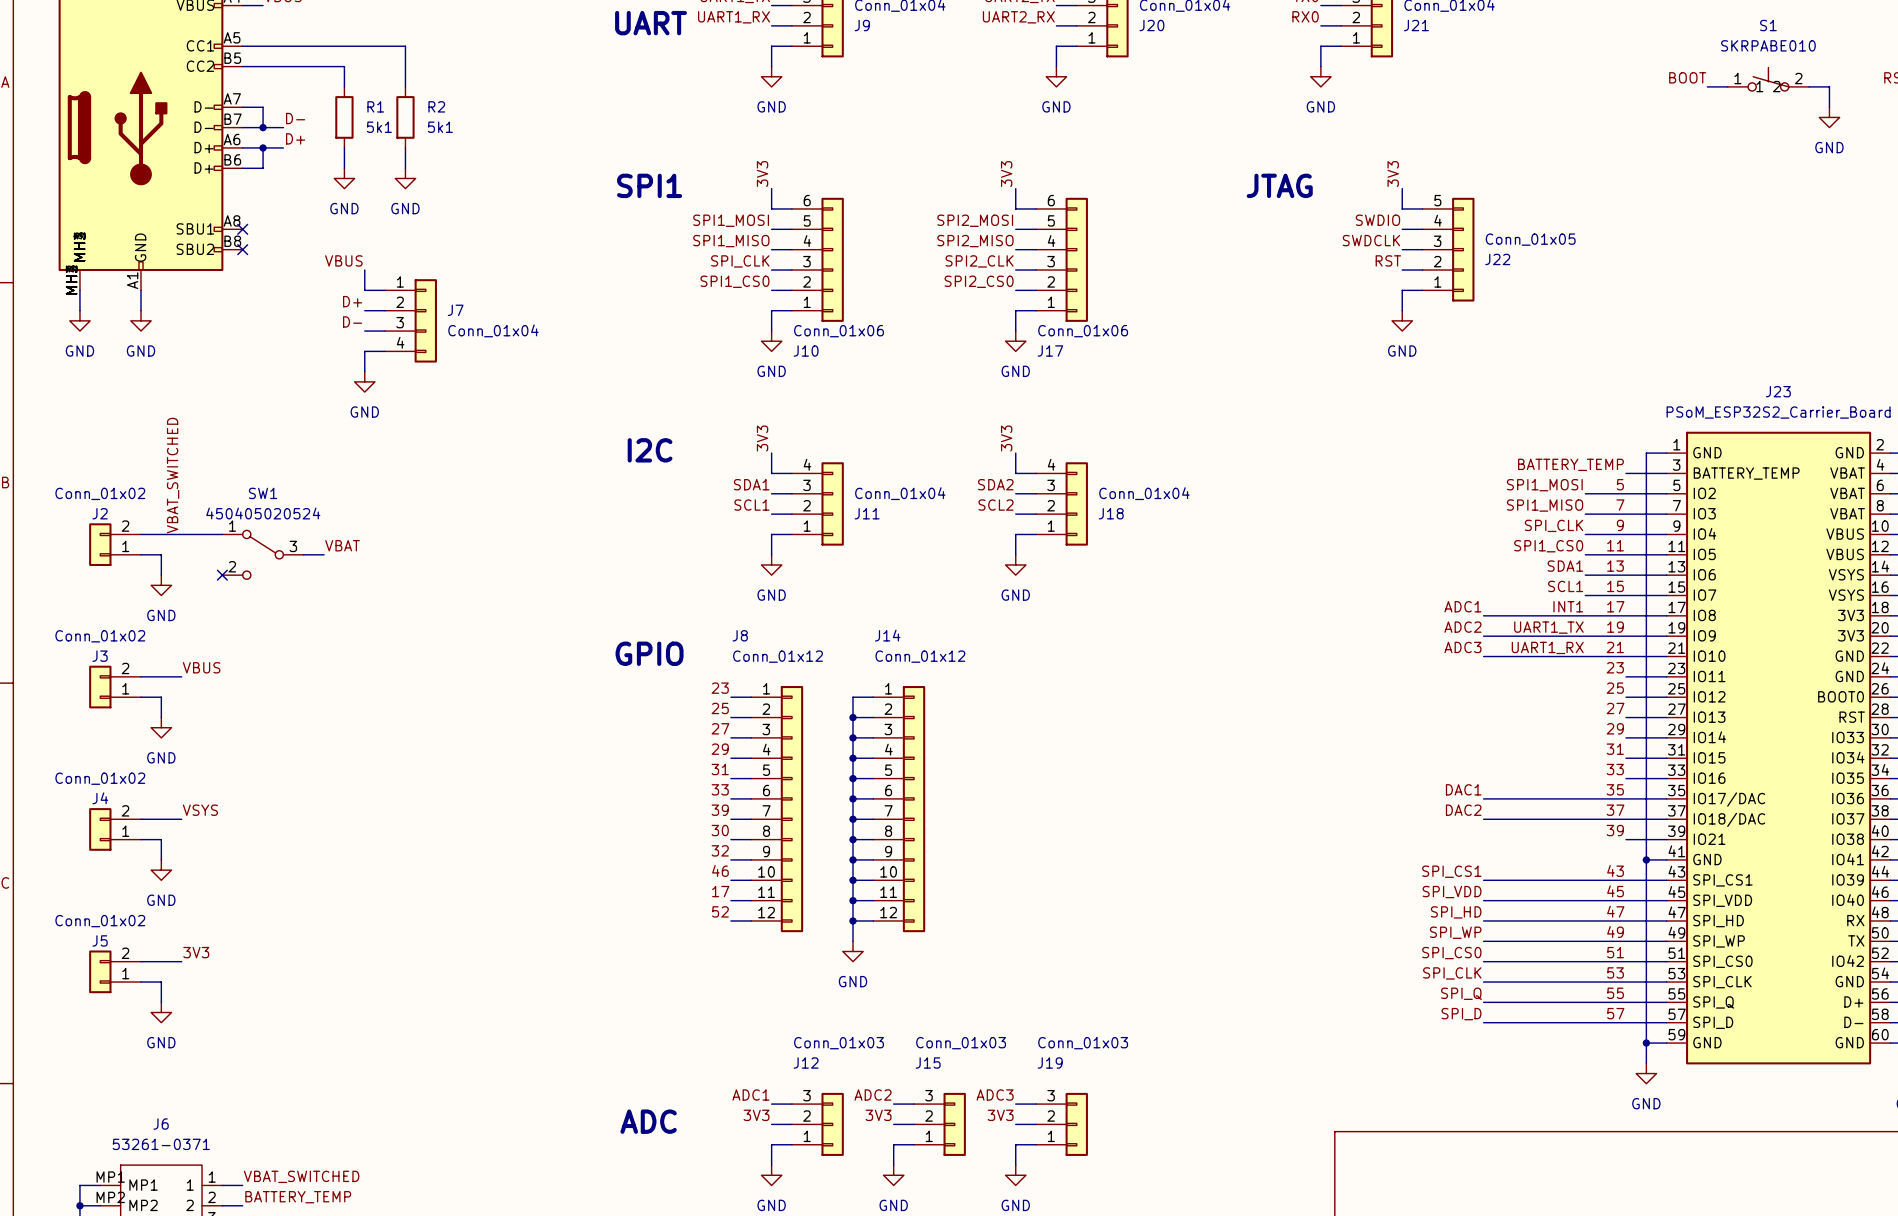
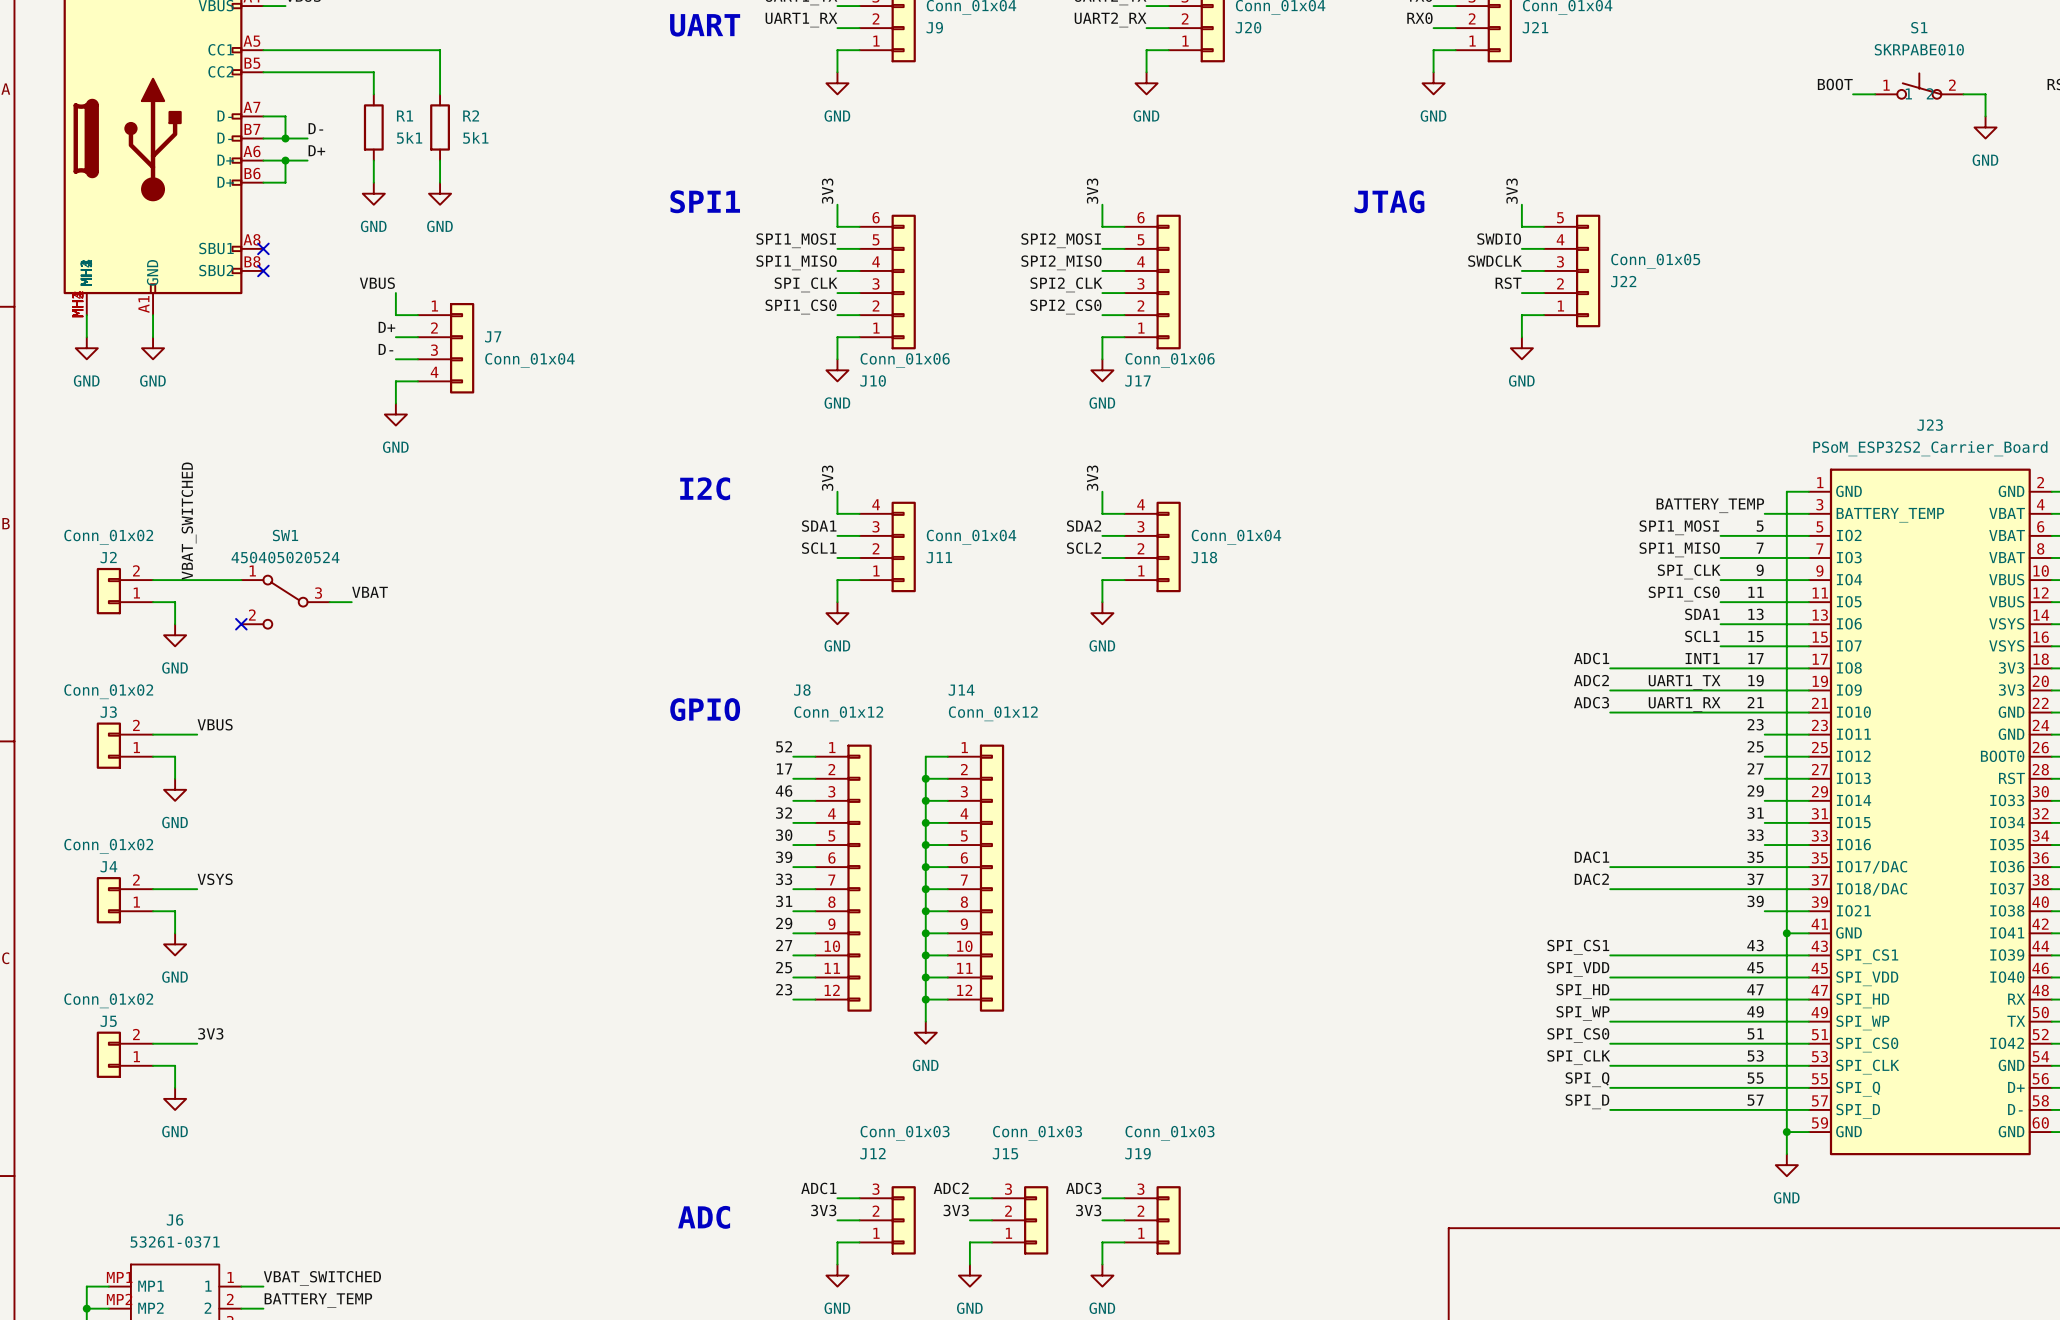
label: 23 (720, 688) -> 52 (784, 746)
label: 25 (720, 708) -> 17 (784, 768)
label: 27 (720, 728) -> 46 (784, 791)
label: 29 (720, 749) -> 32 (784, 813)
label: 31 (720, 769) -> 30 (784, 835)
label: 33 (720, 789) -> 39 (784, 857)
label: 39 (720, 810) -> 33 (784, 879)
label: 30 (720, 830) -> 31 (784, 901)
label: 32 (720, 850) -> 29 (784, 923)
label: 46 (720, 870) -> 27 (784, 945)
label: 17 (720, 891) -> 25 (784, 967)
label: 52 (720, 911) -> 23 (784, 989)

